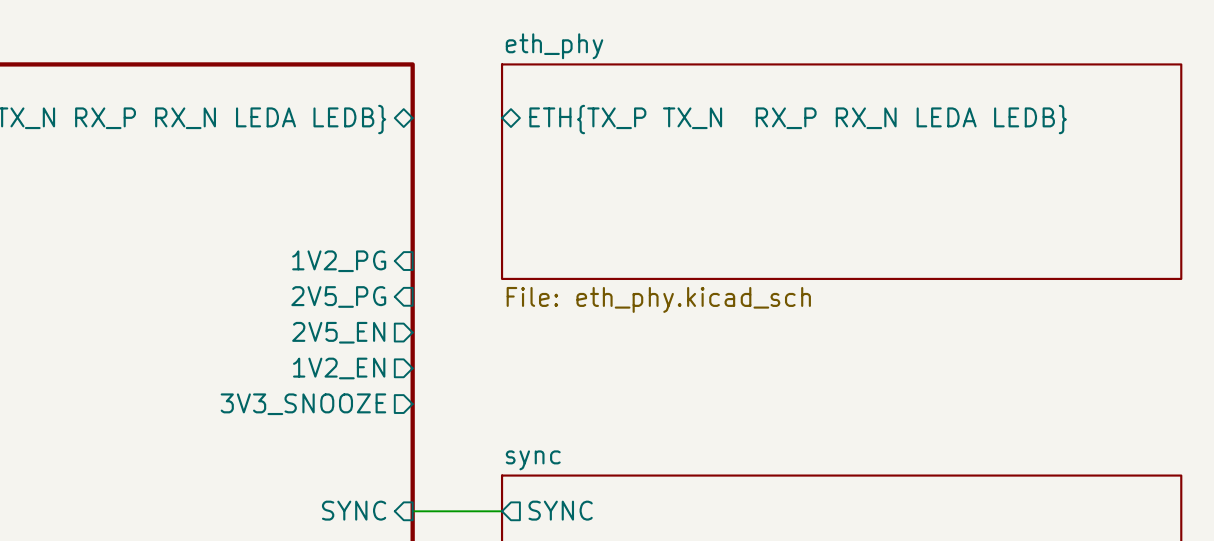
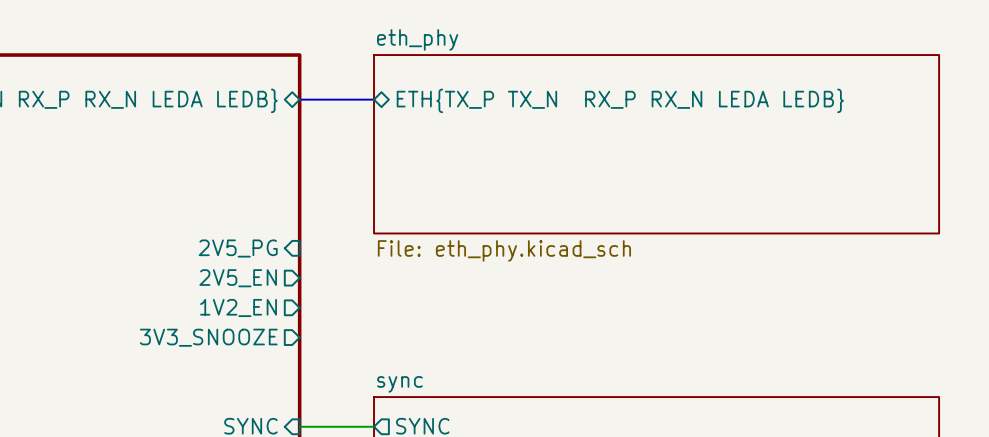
bus: none -> (299, 99) (374, 99)
sheet pin: 1V2_PG (339, 261) -> none

